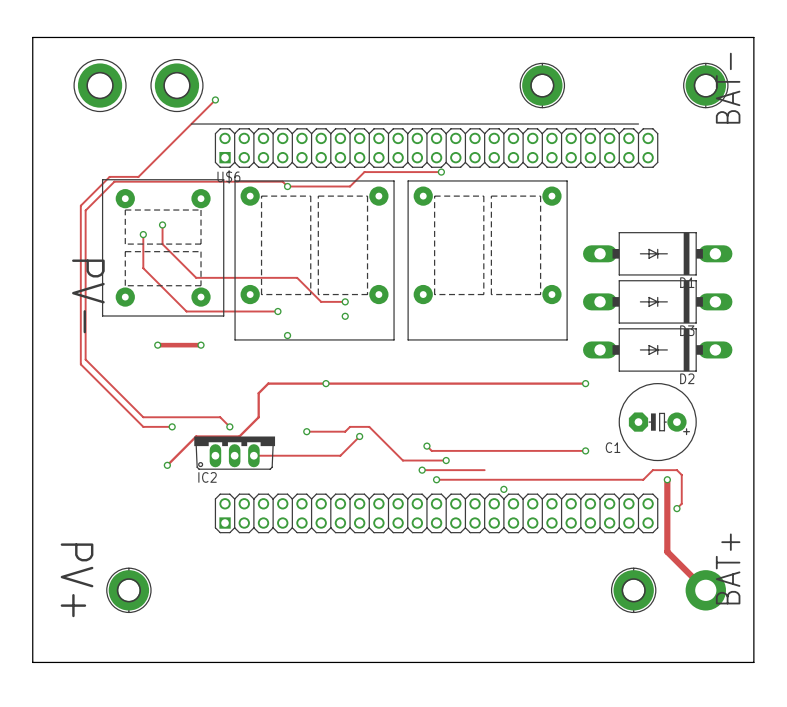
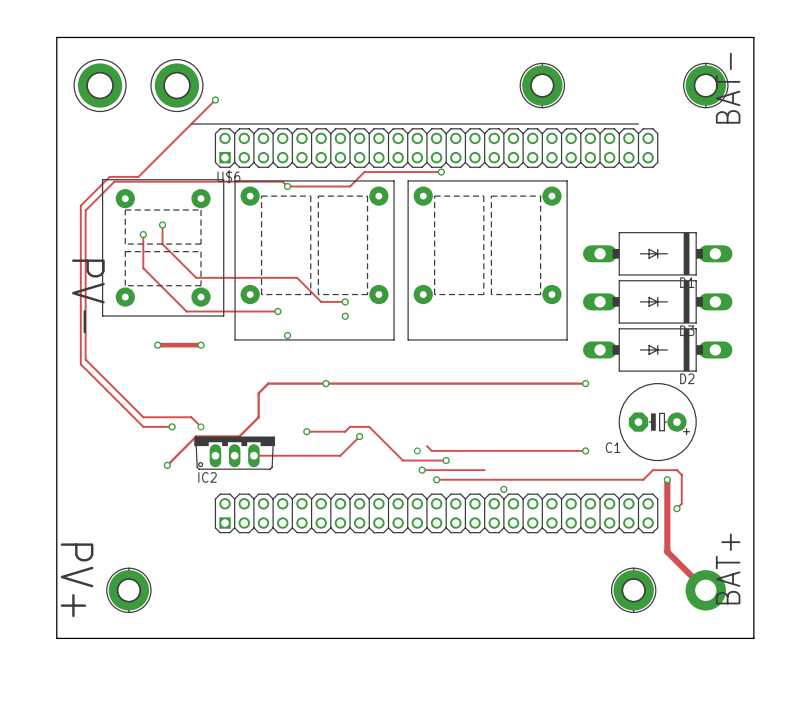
board edge: (56, 37) (32, 37) (32, 662) (753, 662) (753, 638) -> (56, 37) (56, 638) (753, 638)
track: (191, 417) (220, 417) (229, 426) -> (191, 417) (201, 426)
via: none -> (201, 426)
via: (229, 426) -> none
via: (426, 446) -> none
via: none -> (417, 450)

